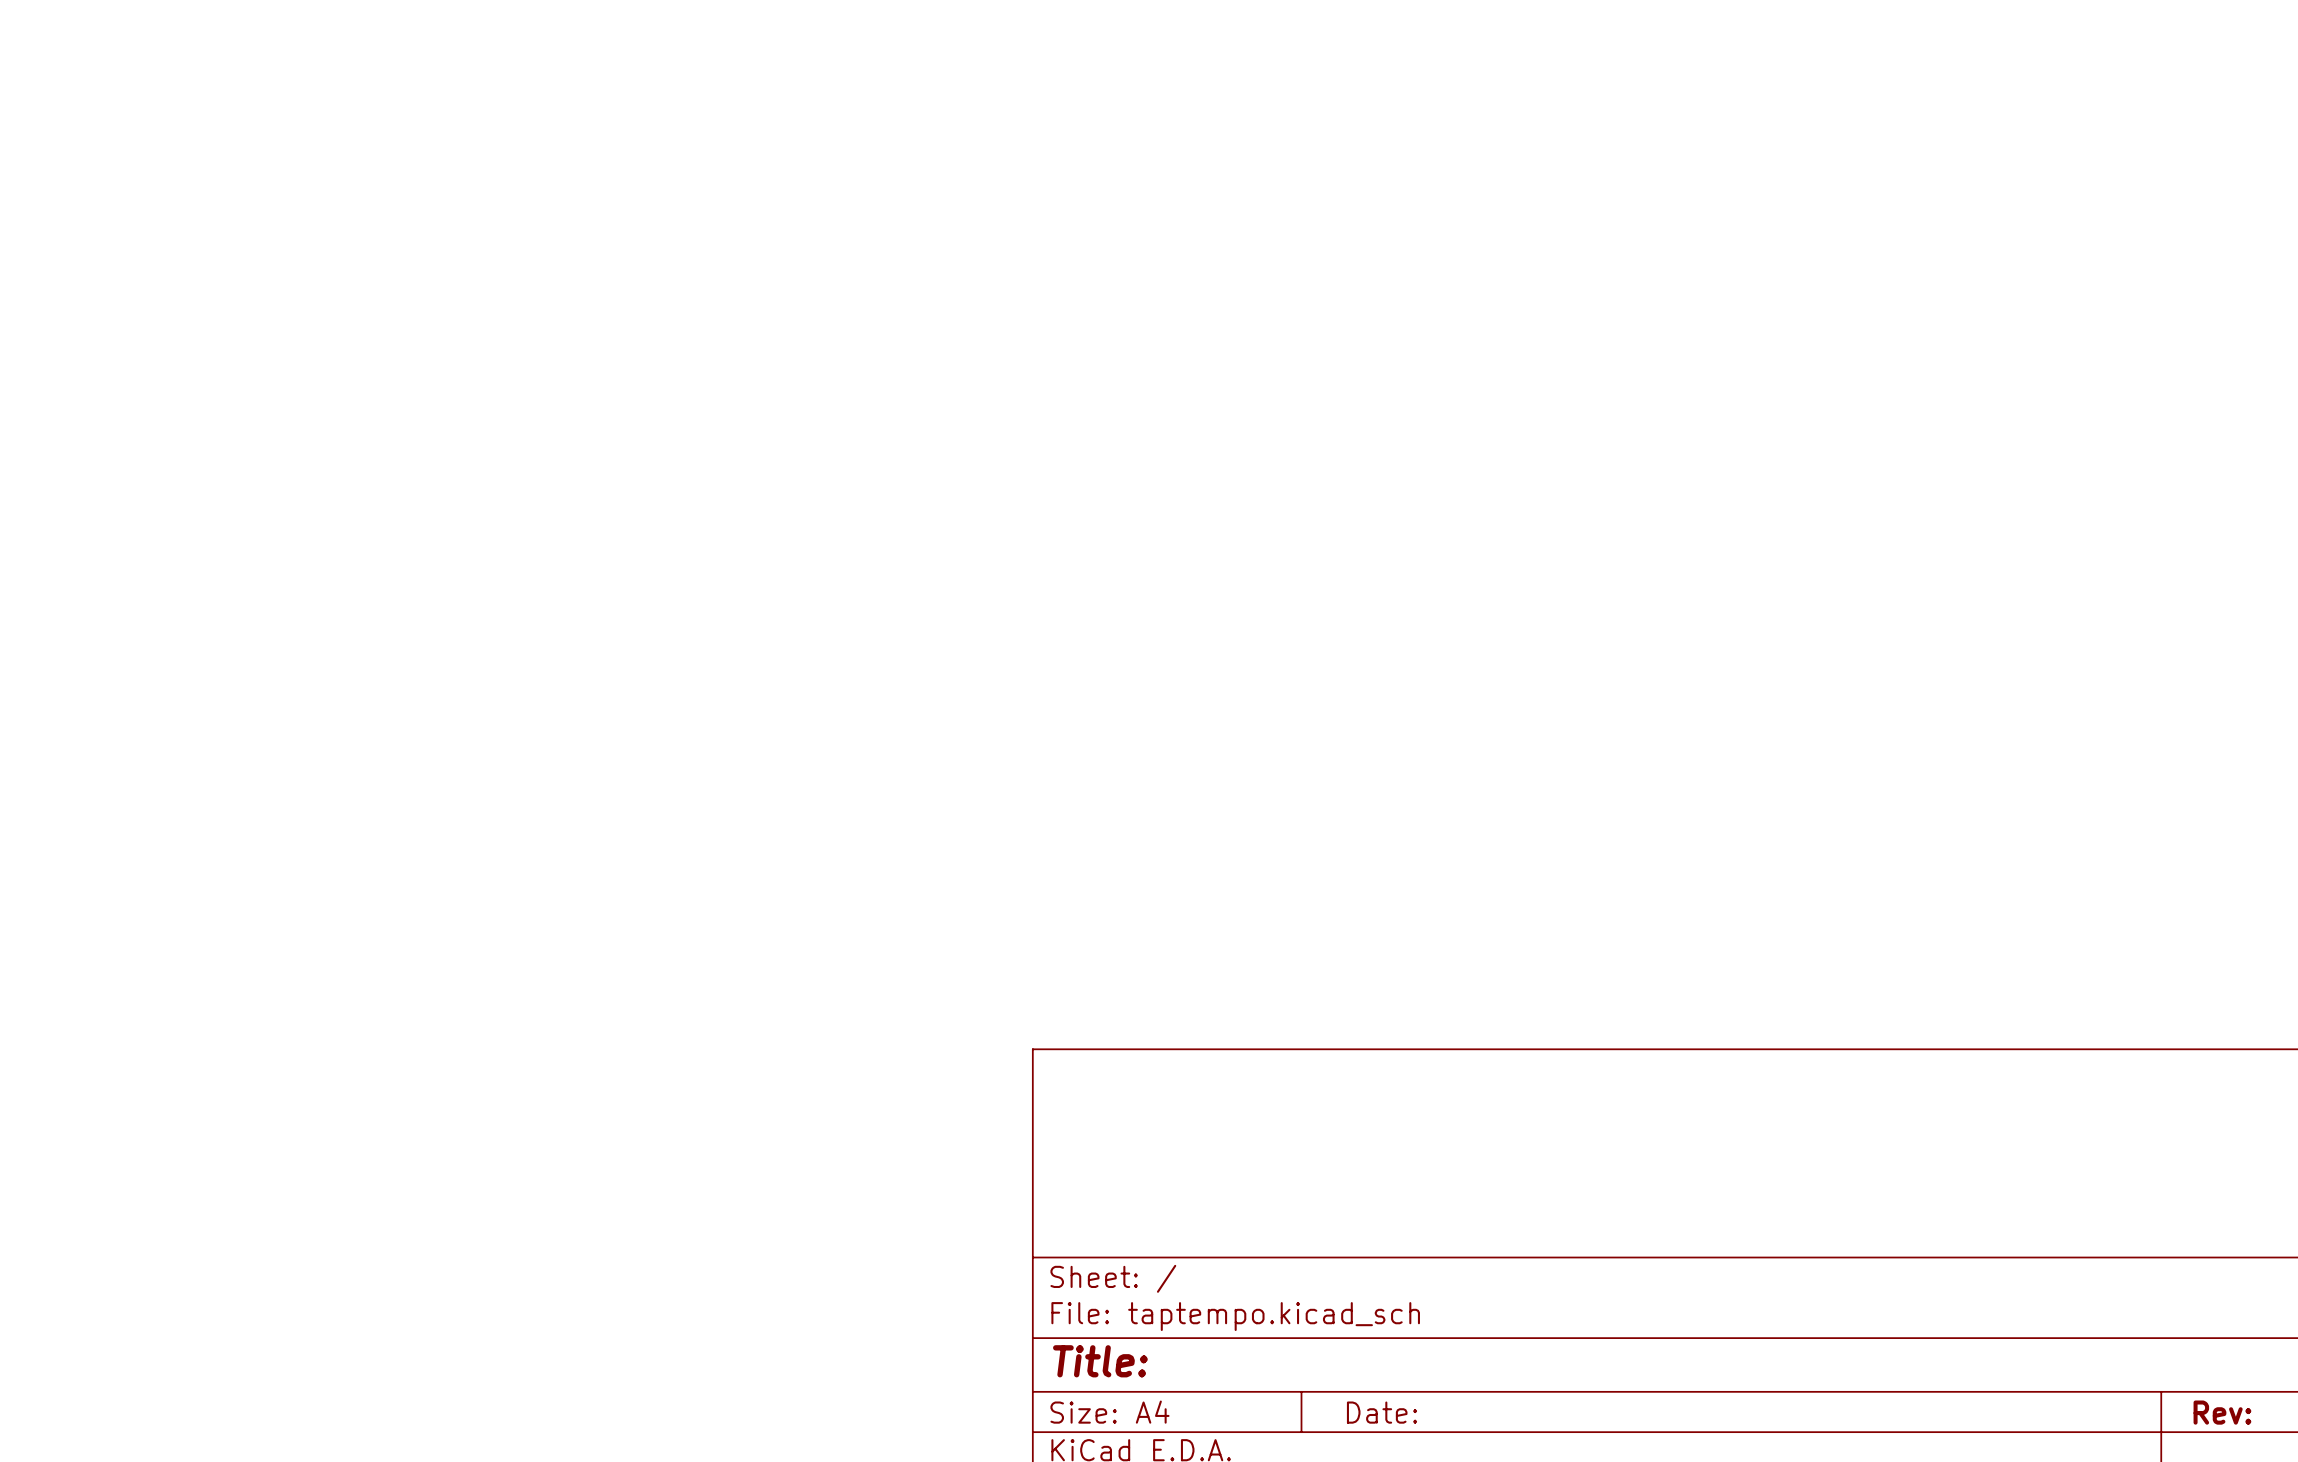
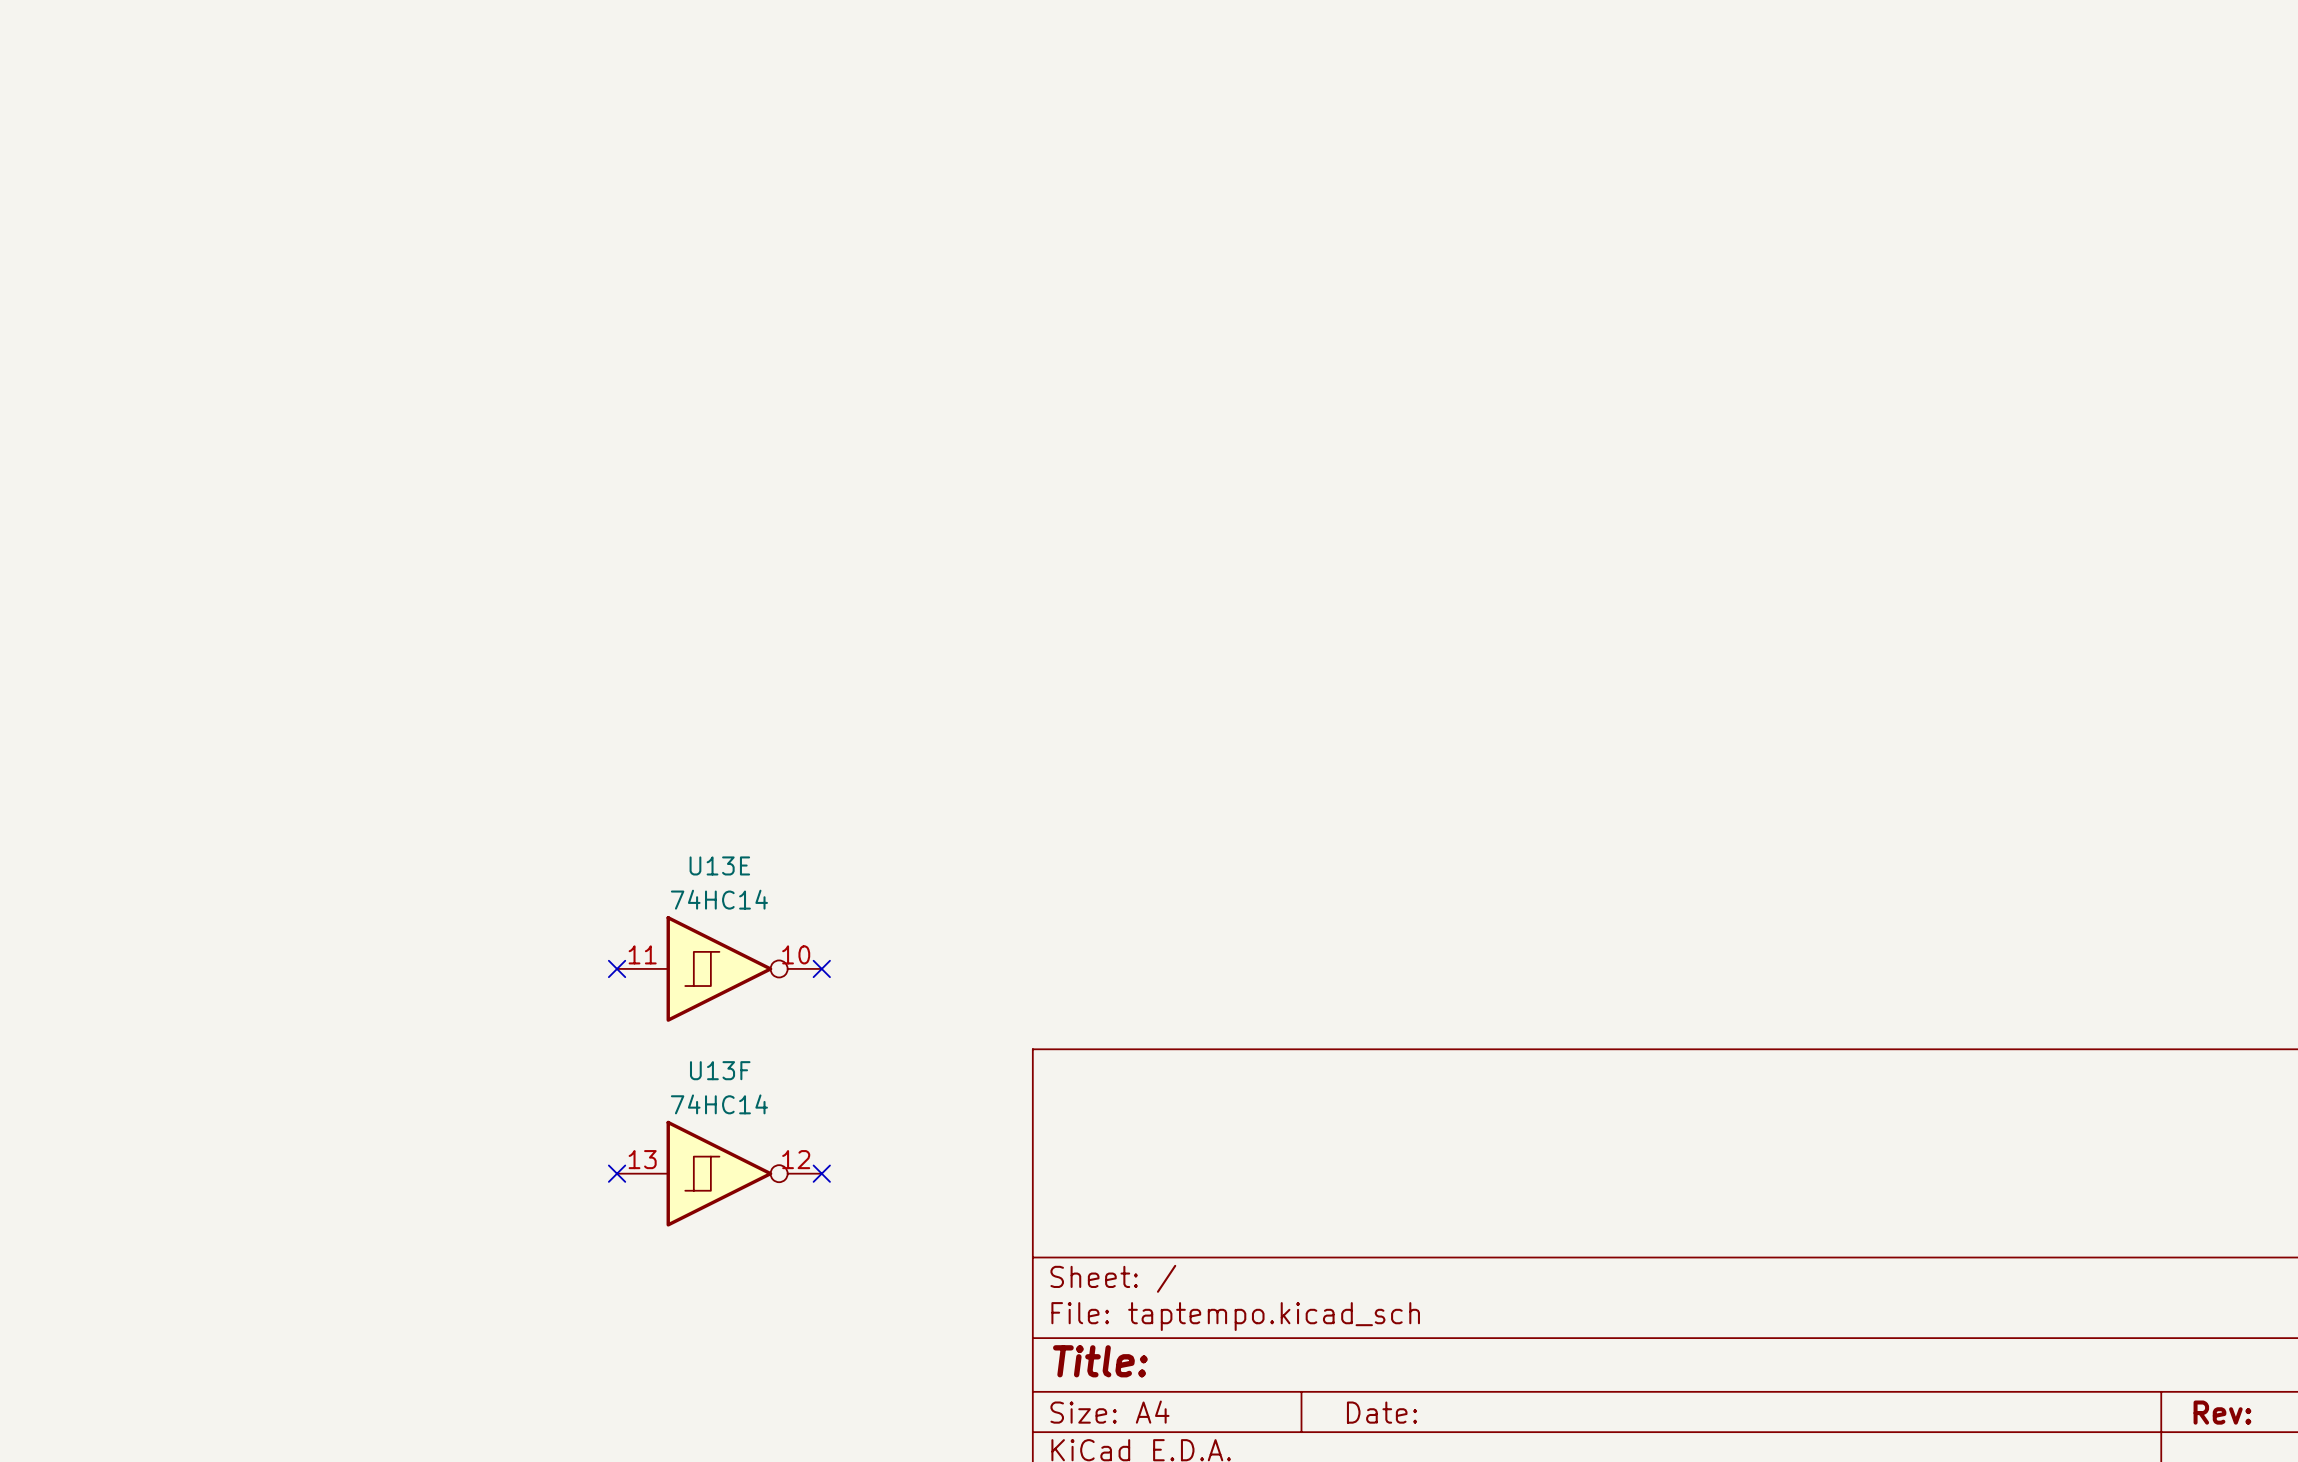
no-connect mark: none -> (617, 968)
U13E: none -> 74HC14 (719, 968)
no-connect mark: none -> (821, 968)
no-connect mark: none -> (617, 1173)
U13F: none -> 74HC14 (719, 1173)
no-connect mark: none -> (821, 1173)

